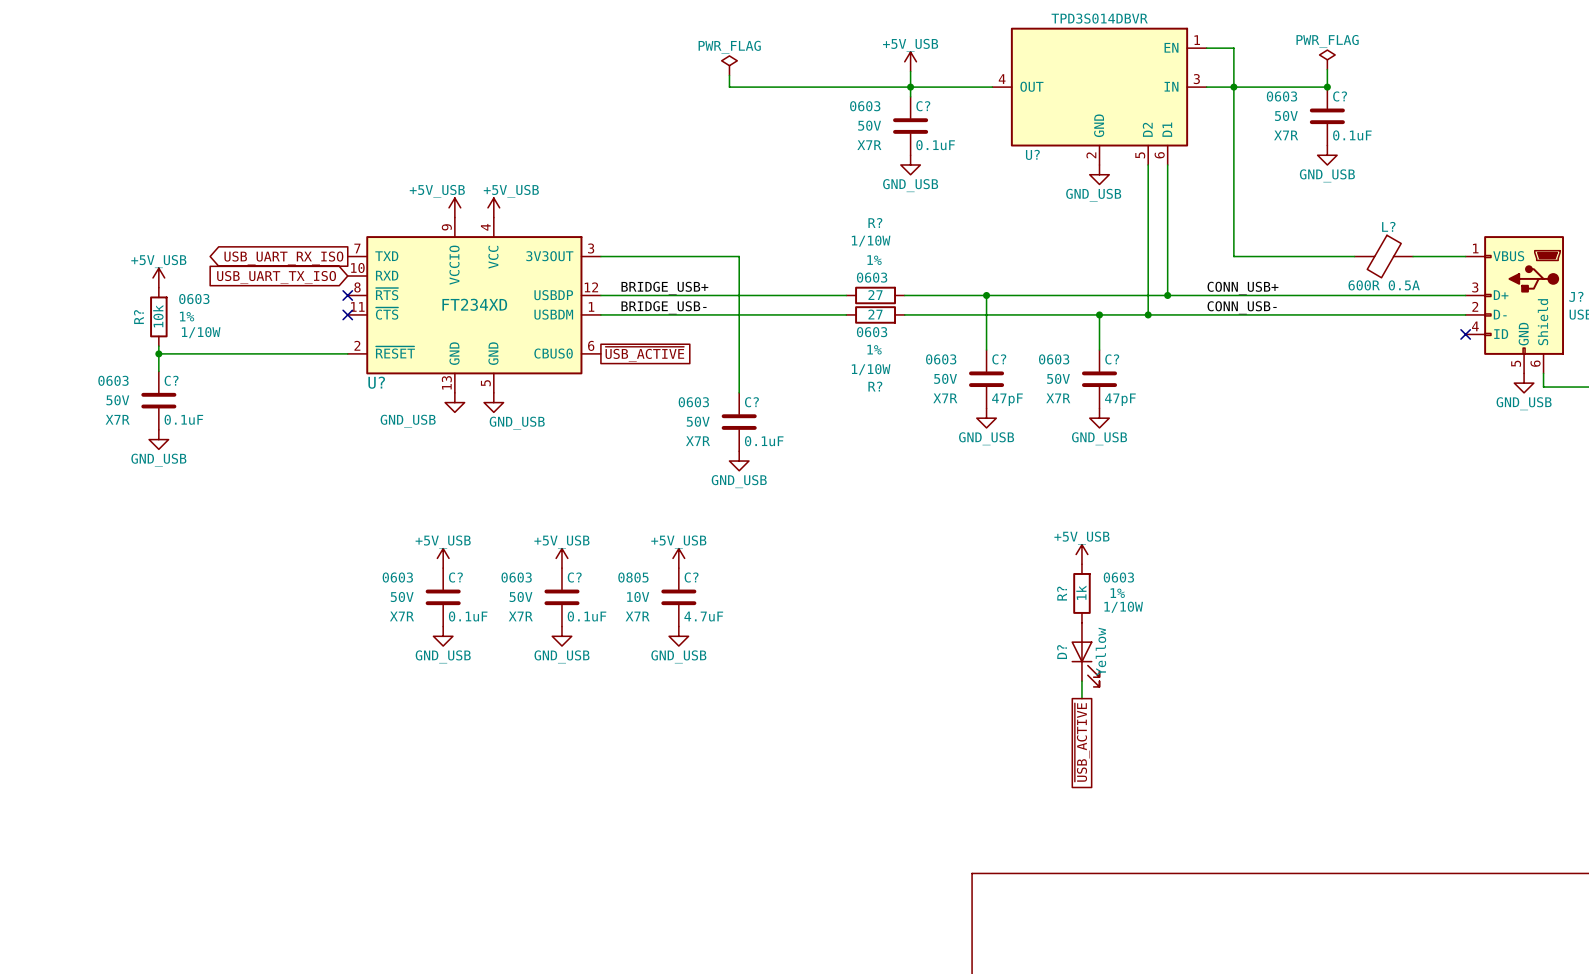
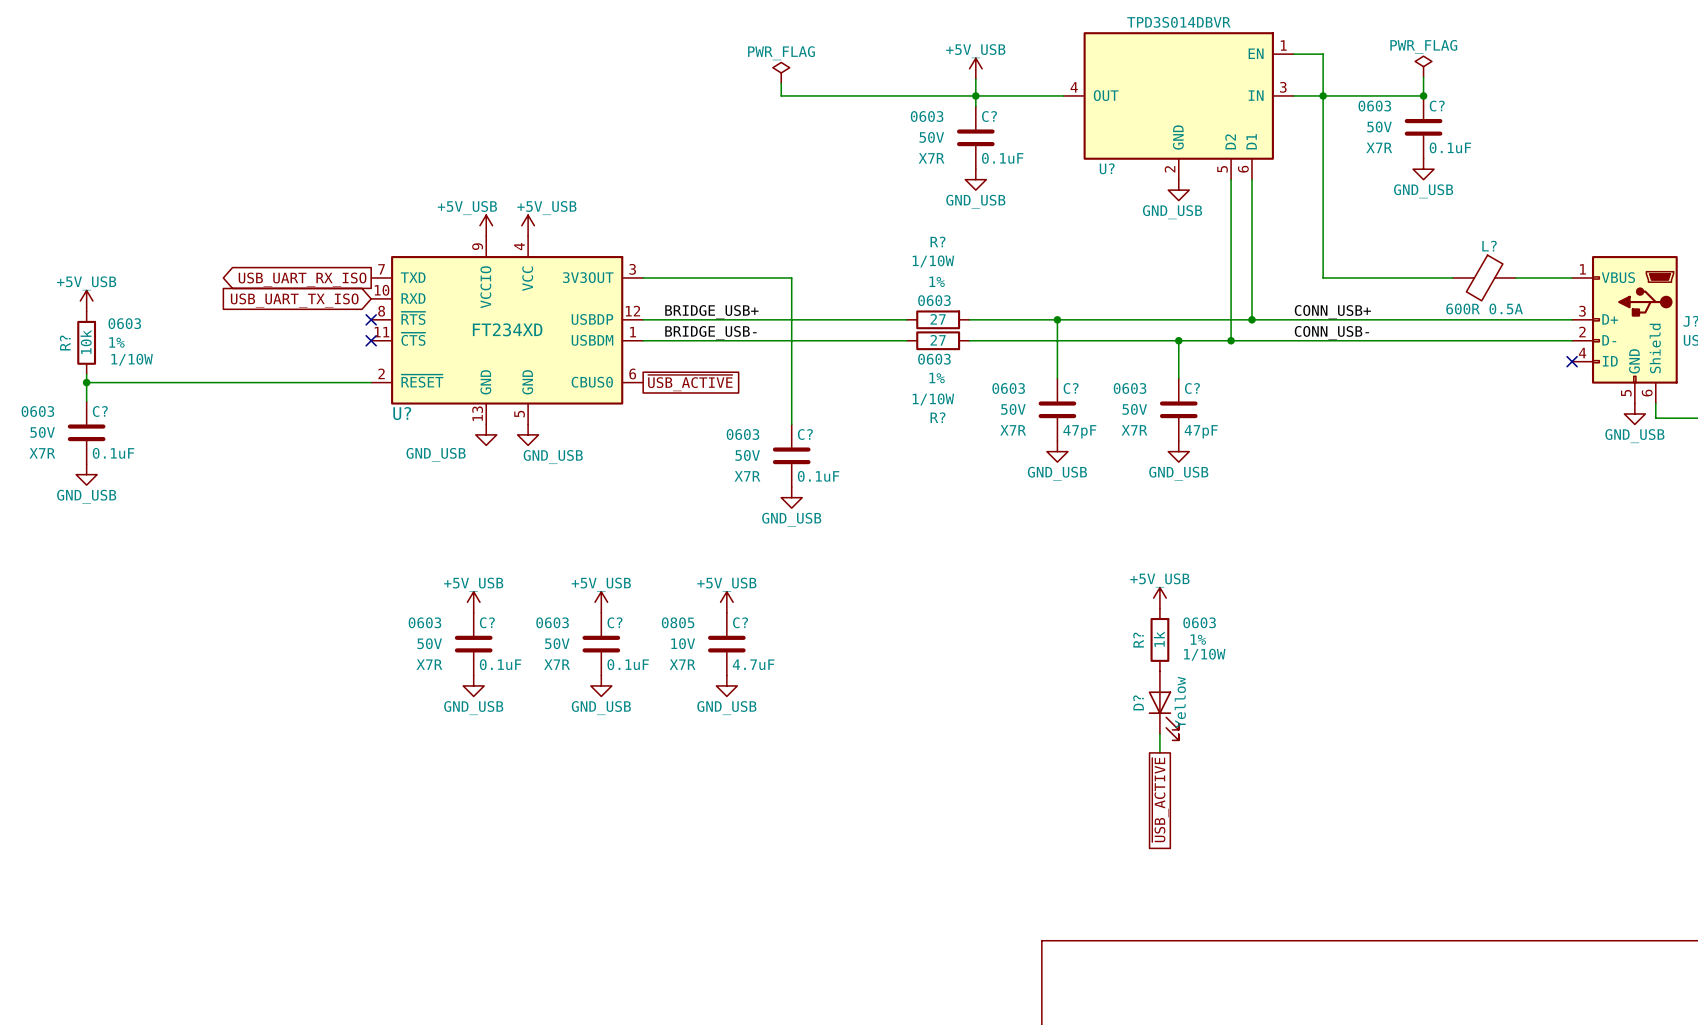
power symbol position: +5V_USB (158, 277) -> +5V_USB (86, 301)
R? position: (158, 316) -> (86, 342)
wire: (158, 346) (158, 371) -> (86, 374) (86, 401)
wire: none -> (86, 382) (168, 382)
junction: none -> (86, 382)
junction: (158, 353) -> none
C? position: (158, 400) -> (86, 432)
power symbol position: GND_USB (158, 439) -> GND_USB (86, 474)

